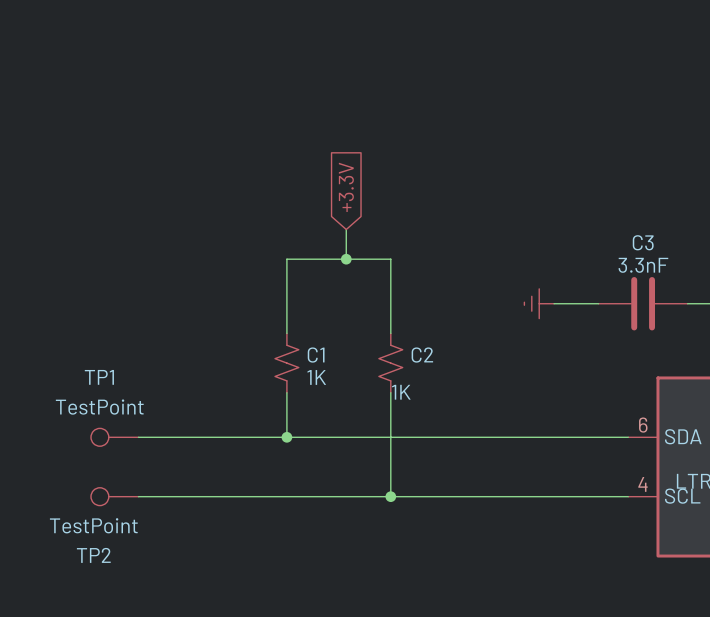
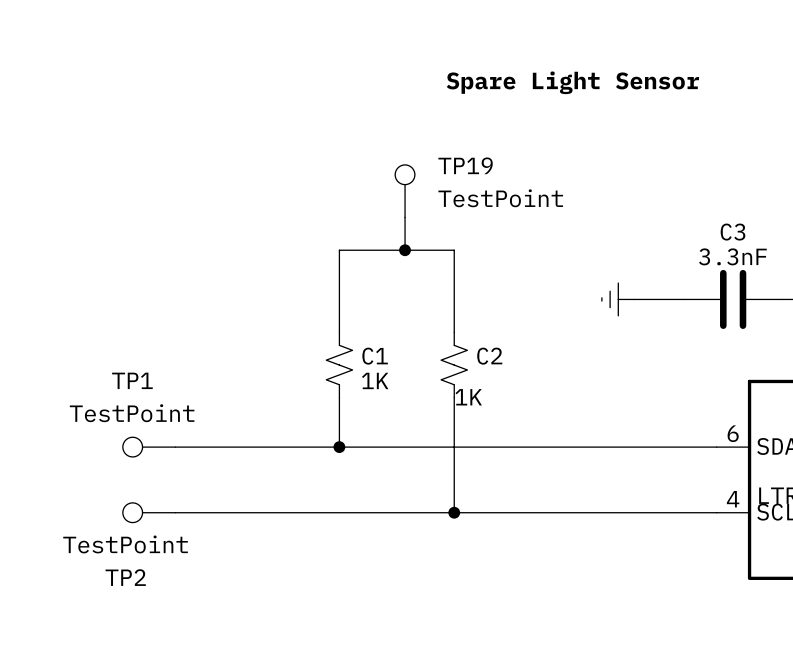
text: none -> Spare Light Sensor (572, 82)
global label: +3.3V (346, 187) -> none
TP19: none -> TestPoint (405, 191)

